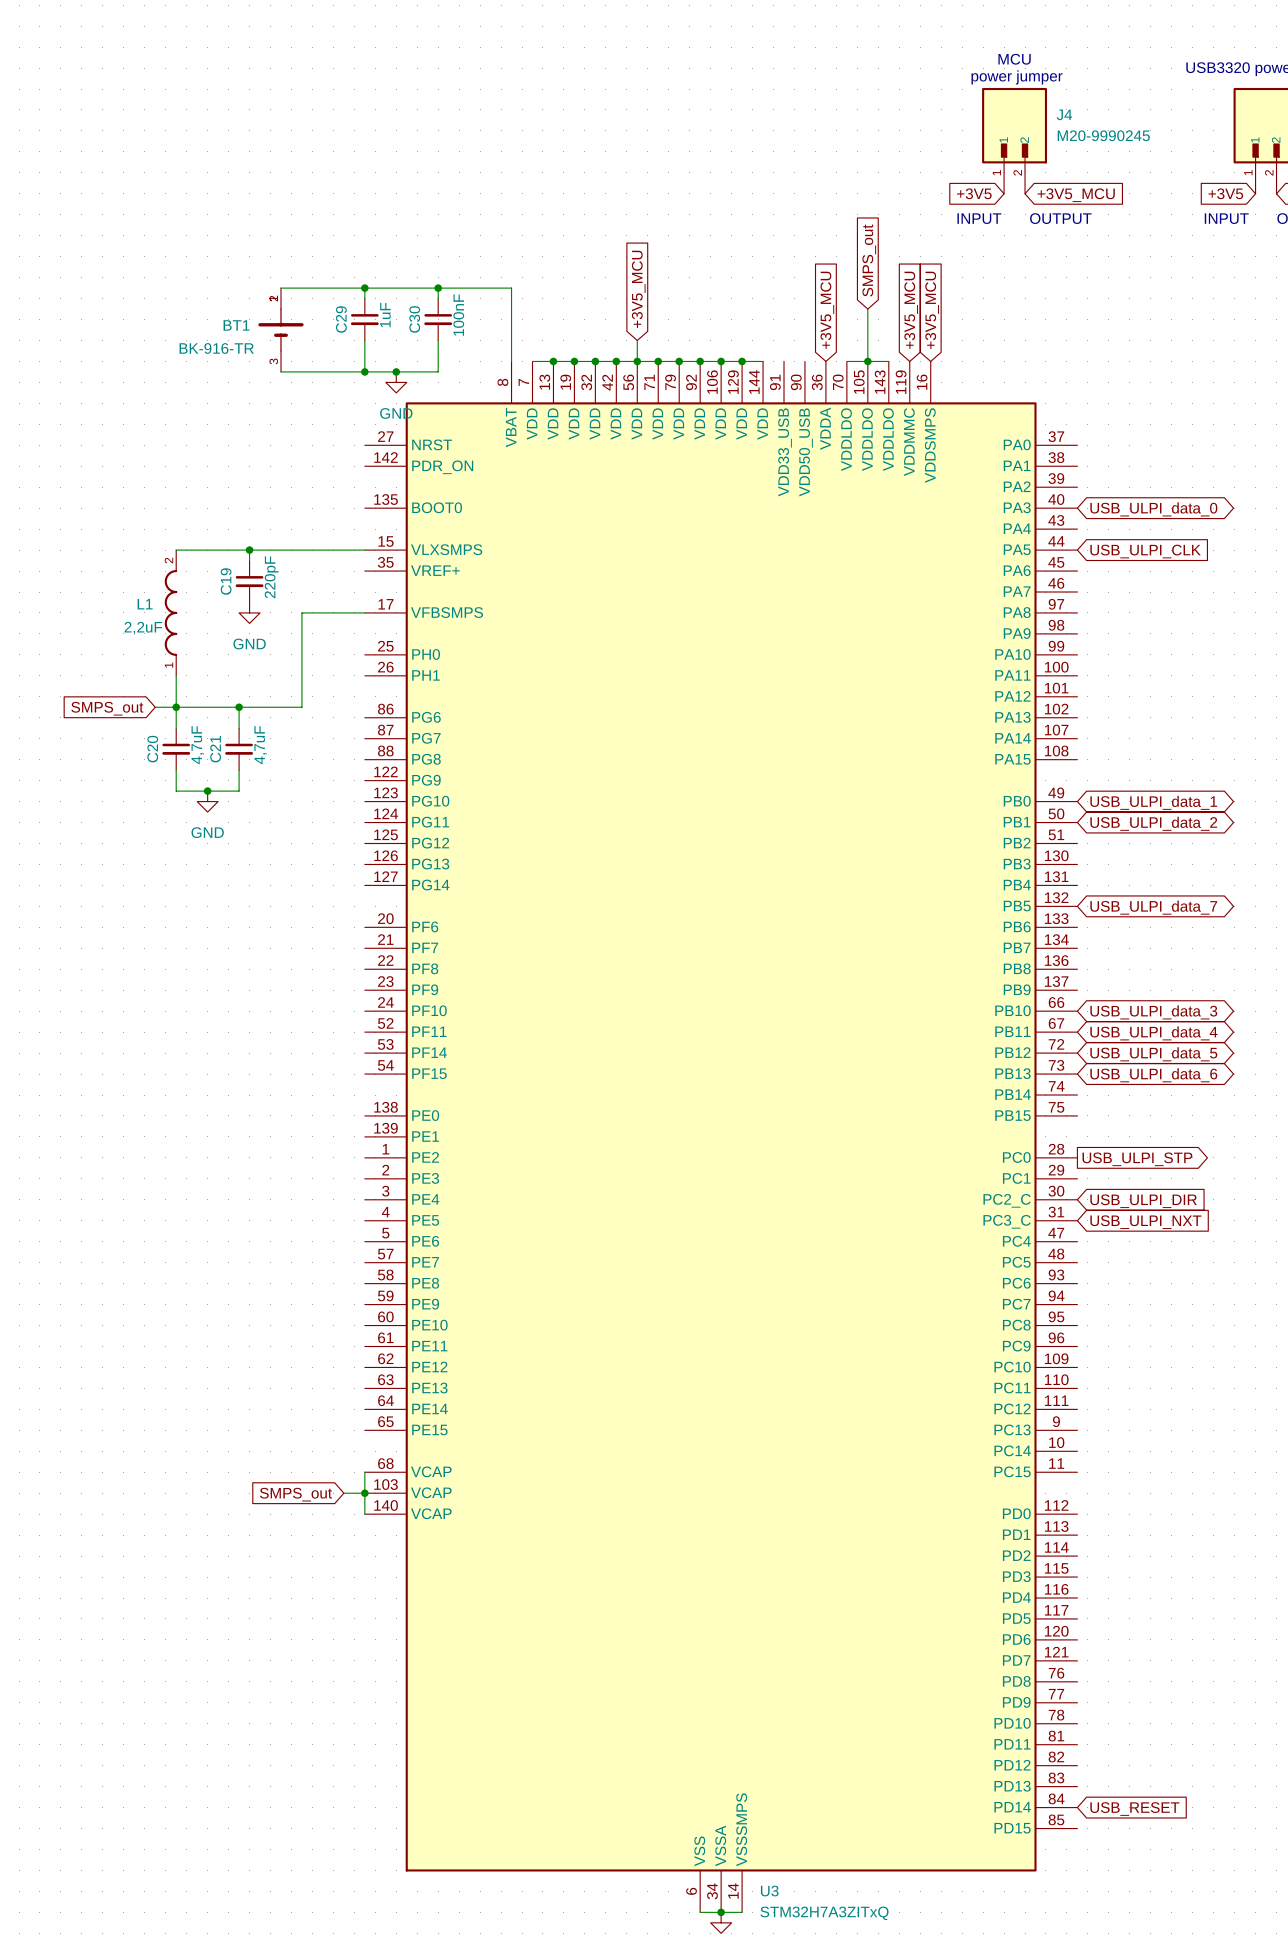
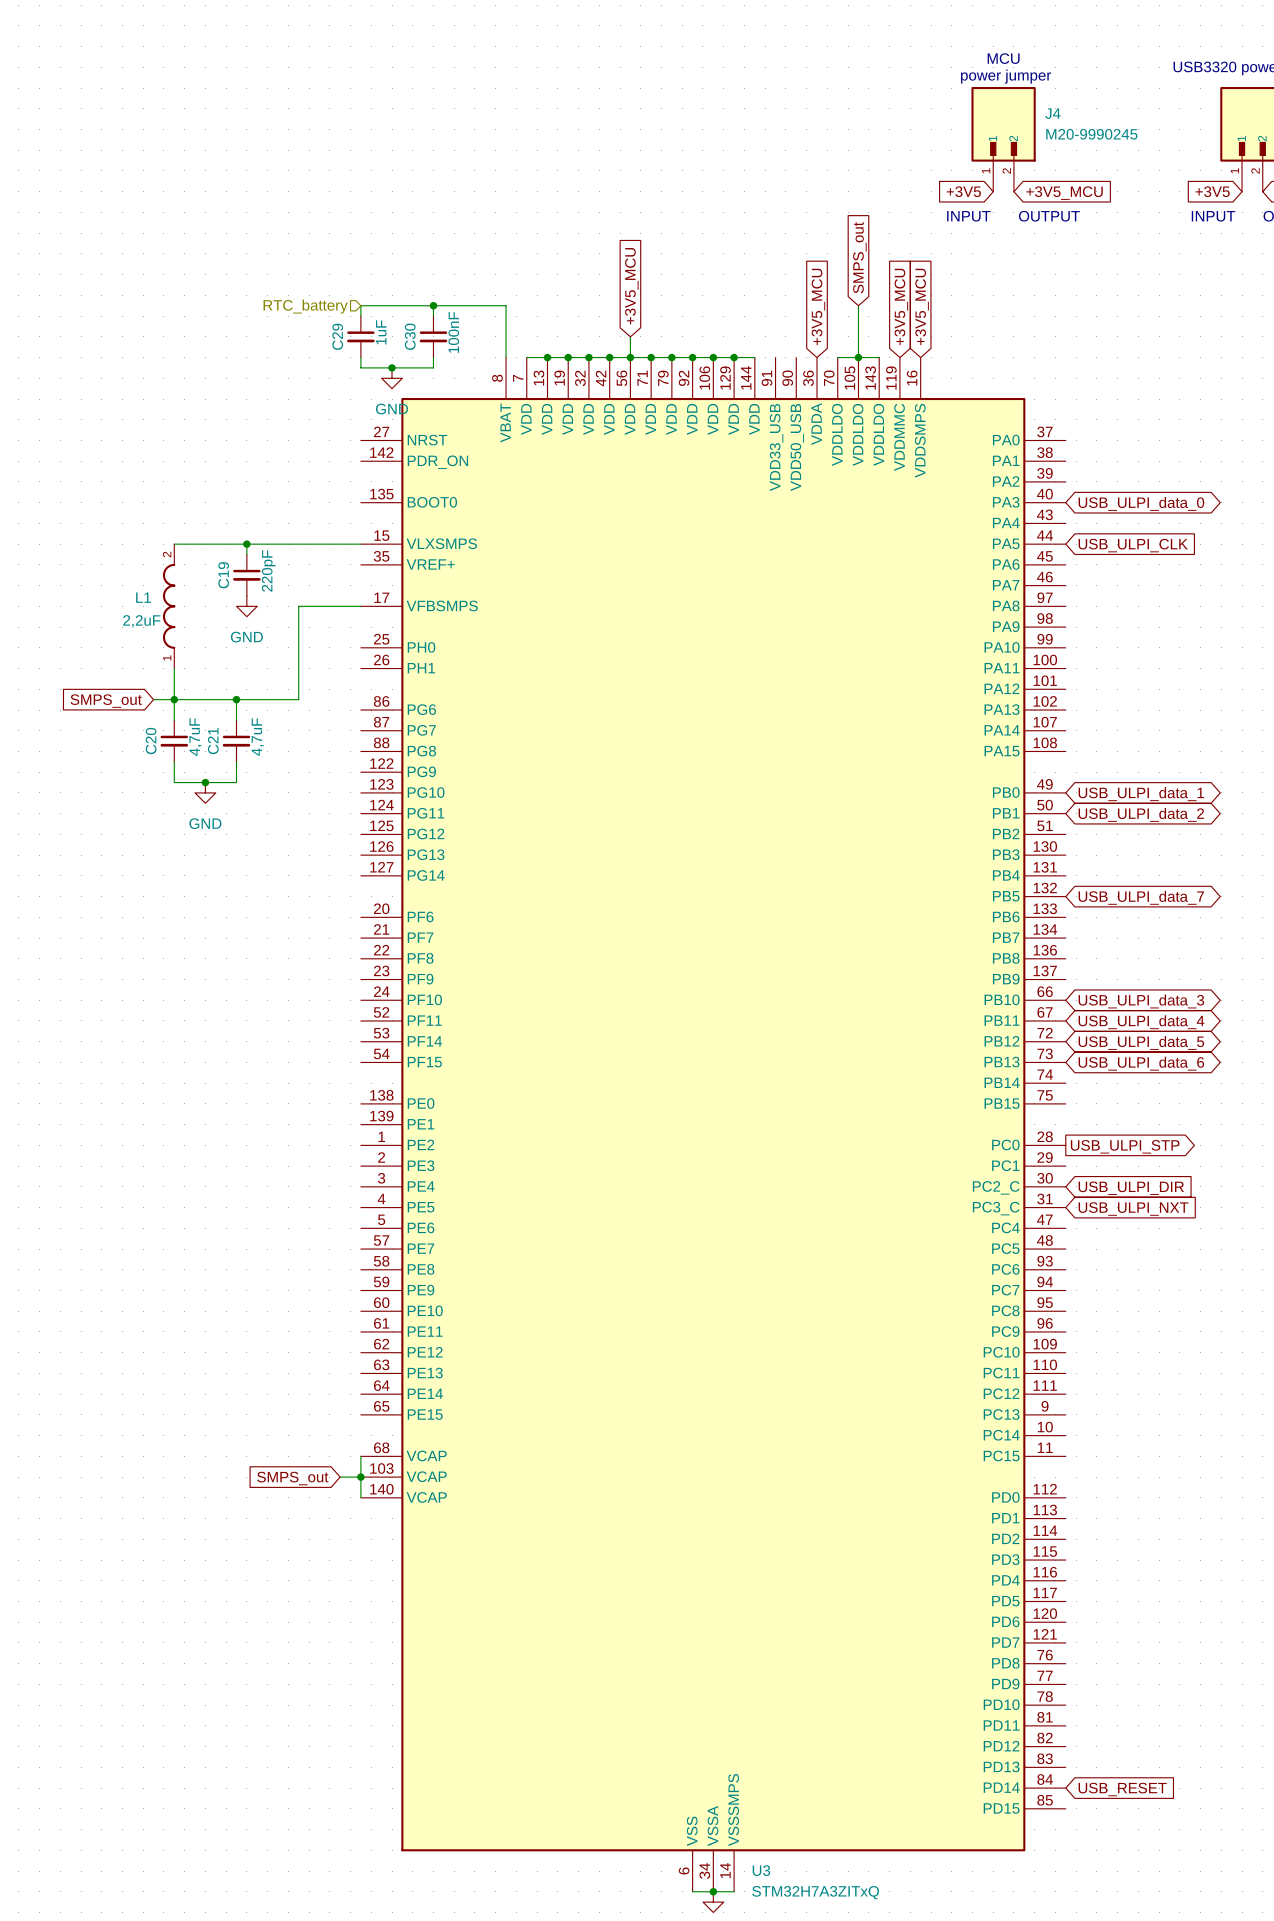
wire: (281, 288) (511, 288) (511, 309) -> (360, 316) (360, 305) (506, 305)
wire: (364, 288) (364, 298) -> none
junction: (364, 288) -> none
junction position: (438, 288) -> (433, 305)
hierarchical label: none -> RTC_battery (305, 306)
C29 position: (364, 319) -> (360, 336)
C30 position: (438, 319) -> (433, 336)
BT1: BK-916-TR (281, 330) -> none
wire: (281, 371) (364, 371) -> none
junction: (364, 371) -> none

